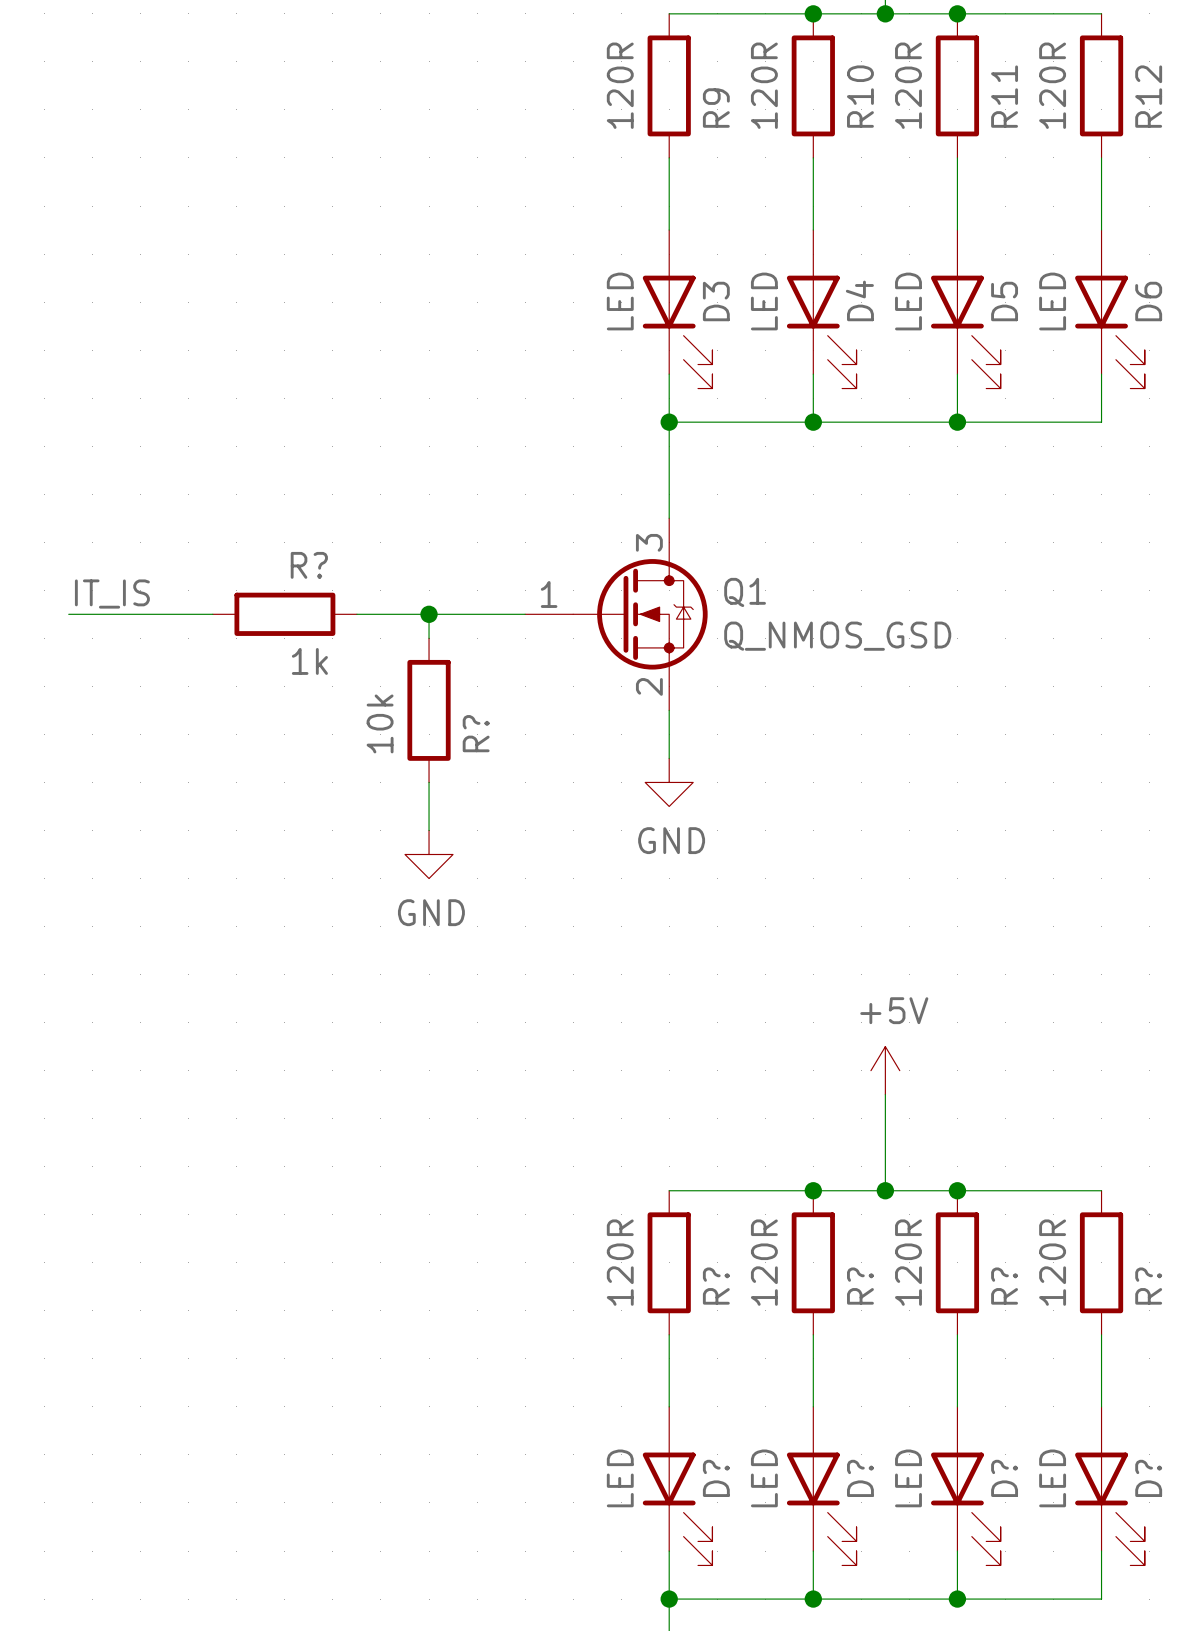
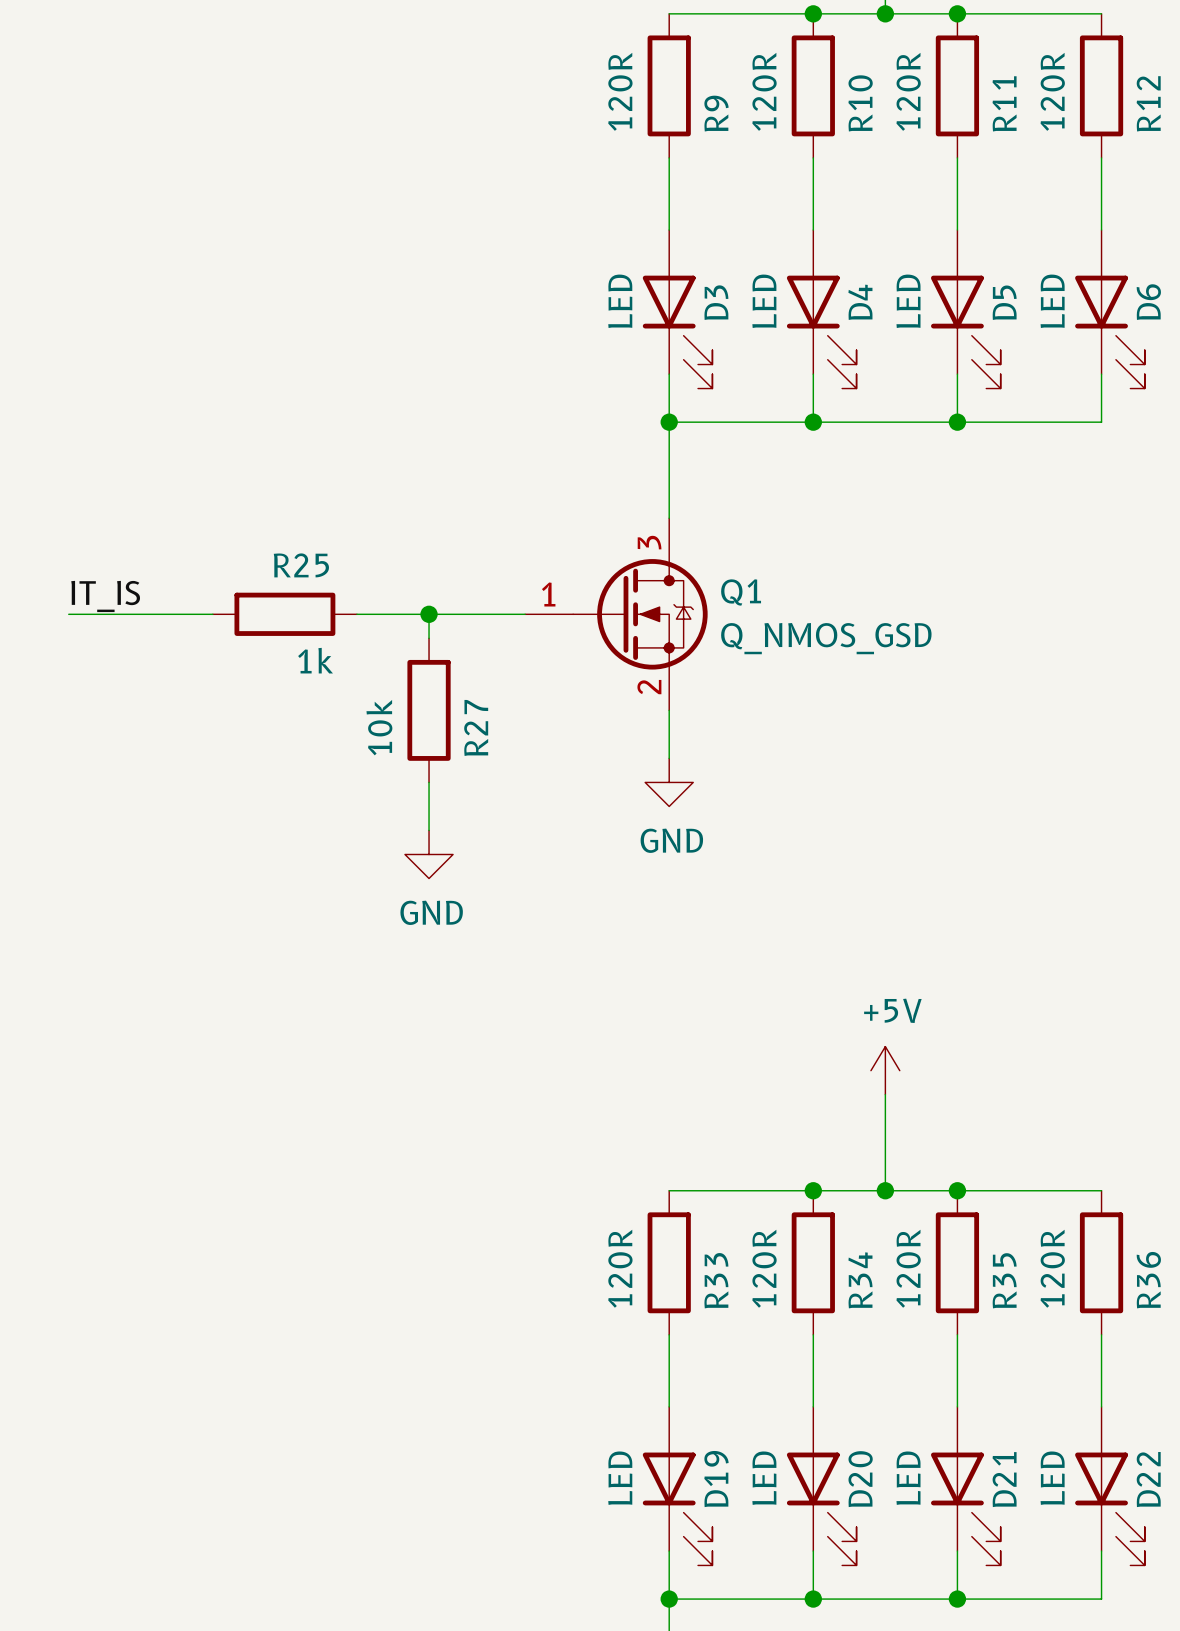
R? name: R? (309, 565) -> R25 (301, 565)
R? name: R? (476, 733) -> R27 (476, 727)
R? name: R? (716, 1286) -> R33 (716, 1280)
R? name: R? (860, 1286) -> R34 (860, 1280)
R? name: R? (1004, 1286) -> R35 (1004, 1280)
R? name: R? (1148, 1286) -> R36 (1148, 1280)
D? name: D? (716, 1478) -> D19 (716, 1479)
D? name: D? (860, 1478) -> D20 (860, 1479)
D? name: D? (1004, 1478) -> D21 (1004, 1479)
D? name: D? (1148, 1478) -> D22 (1148, 1479)

